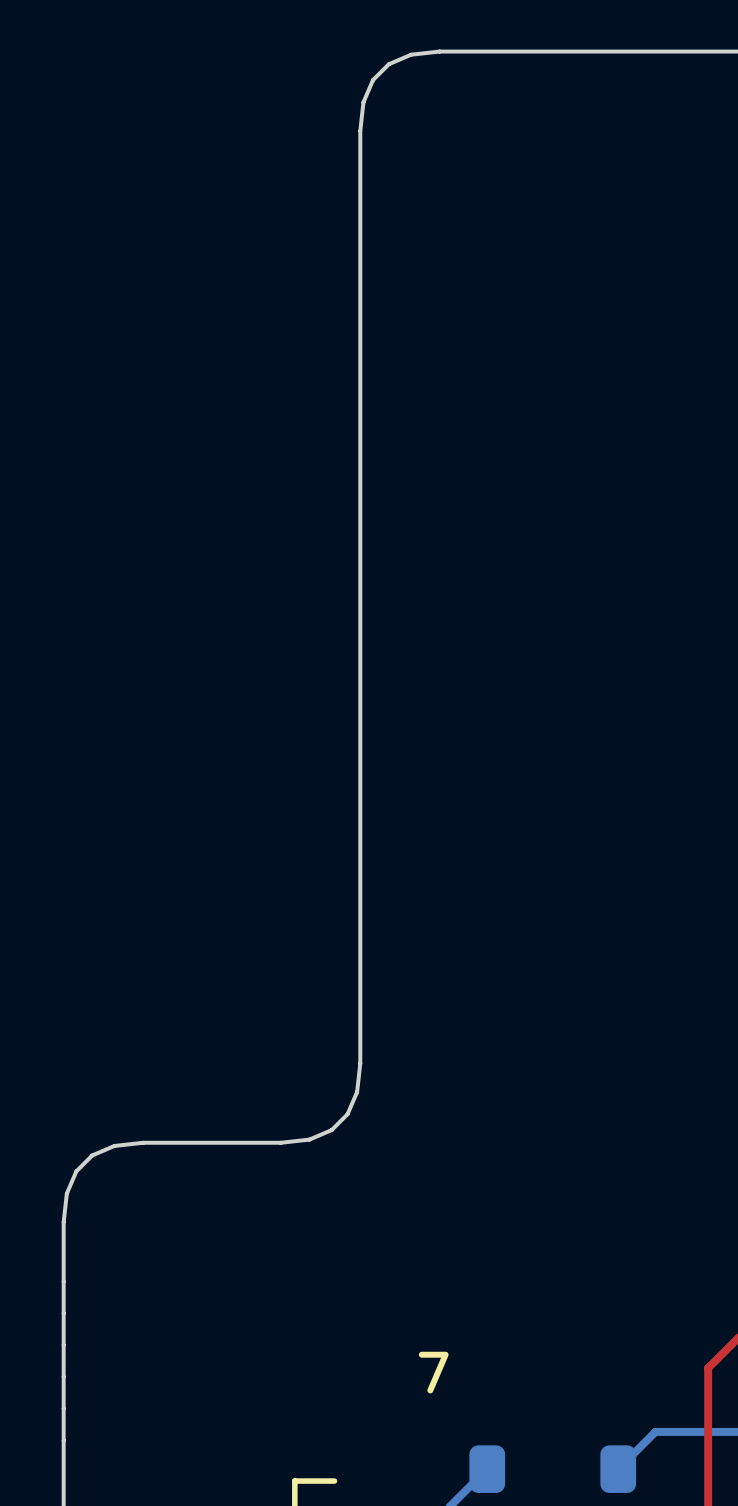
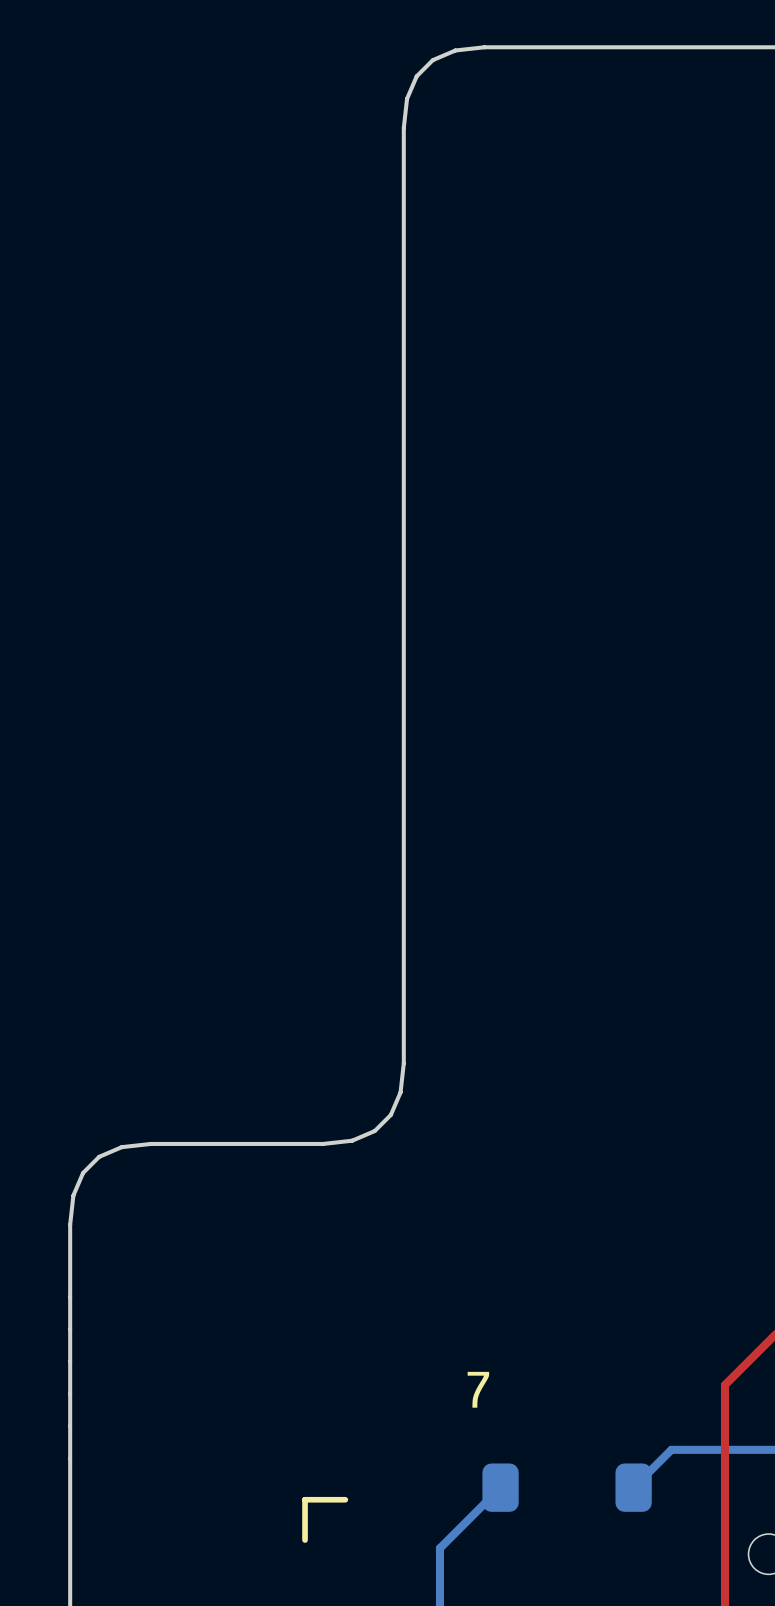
board edge: (471, 51) (439, 51) (411, 54) (388, 64) (372, 80) (363, 102) (360, 130) (360, 1063) (357, 1091) (347, 1114) (331, 1130) (309, 1139) (280, 1142) (143, 1142) (114, 1145) (92, 1155) (76, 1171) (66, 1193) (63, 1222) -> (484, 47) (455, 50) (432, 60) (416, 76) (407, 98) (403, 127) (403, 1063) (400, 1092) (390, 1114) (374, 1131) (352, 1140) (323, 1143) (150, 1143) (121, 1147) (99, 1156) (83, 1172) (73, 1195) (70, 1236)
text position: 7 (433, 1372) -> 7 (478, 1389)

